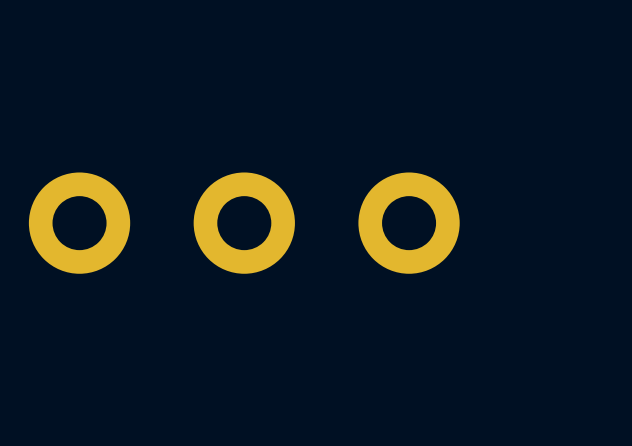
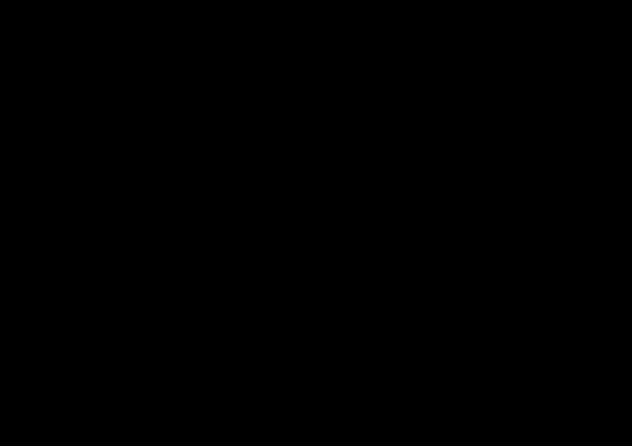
part: (244, 223) -> none

